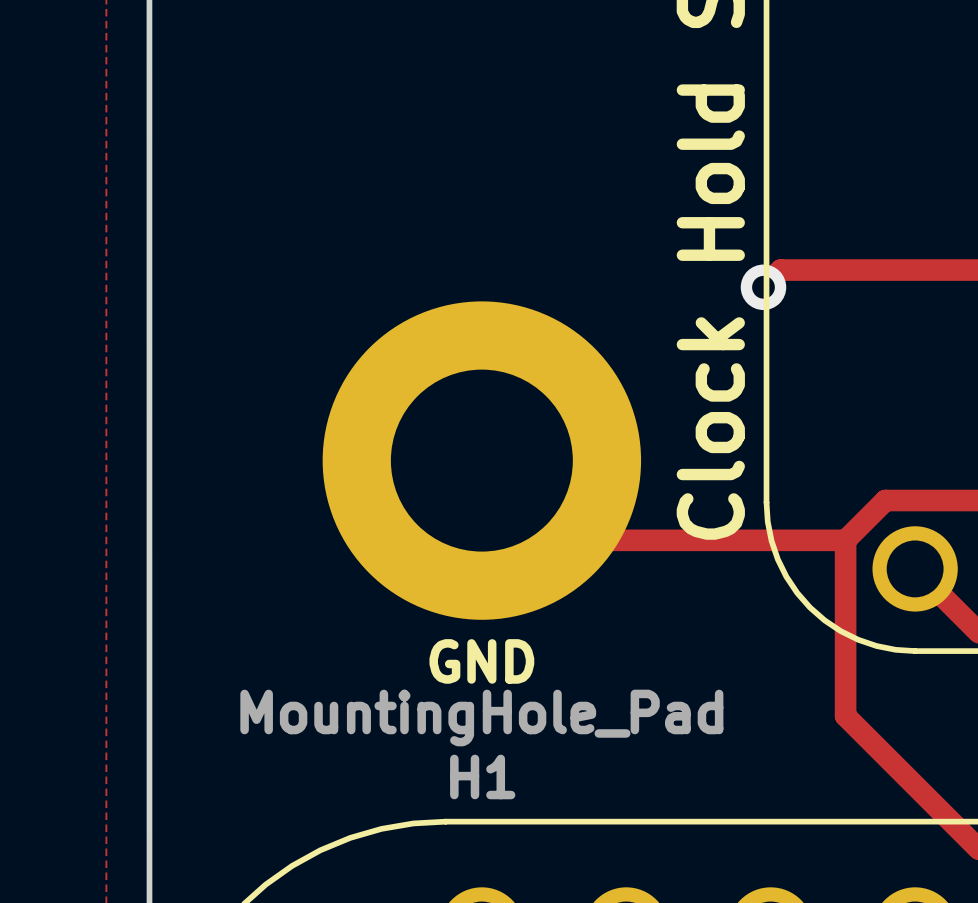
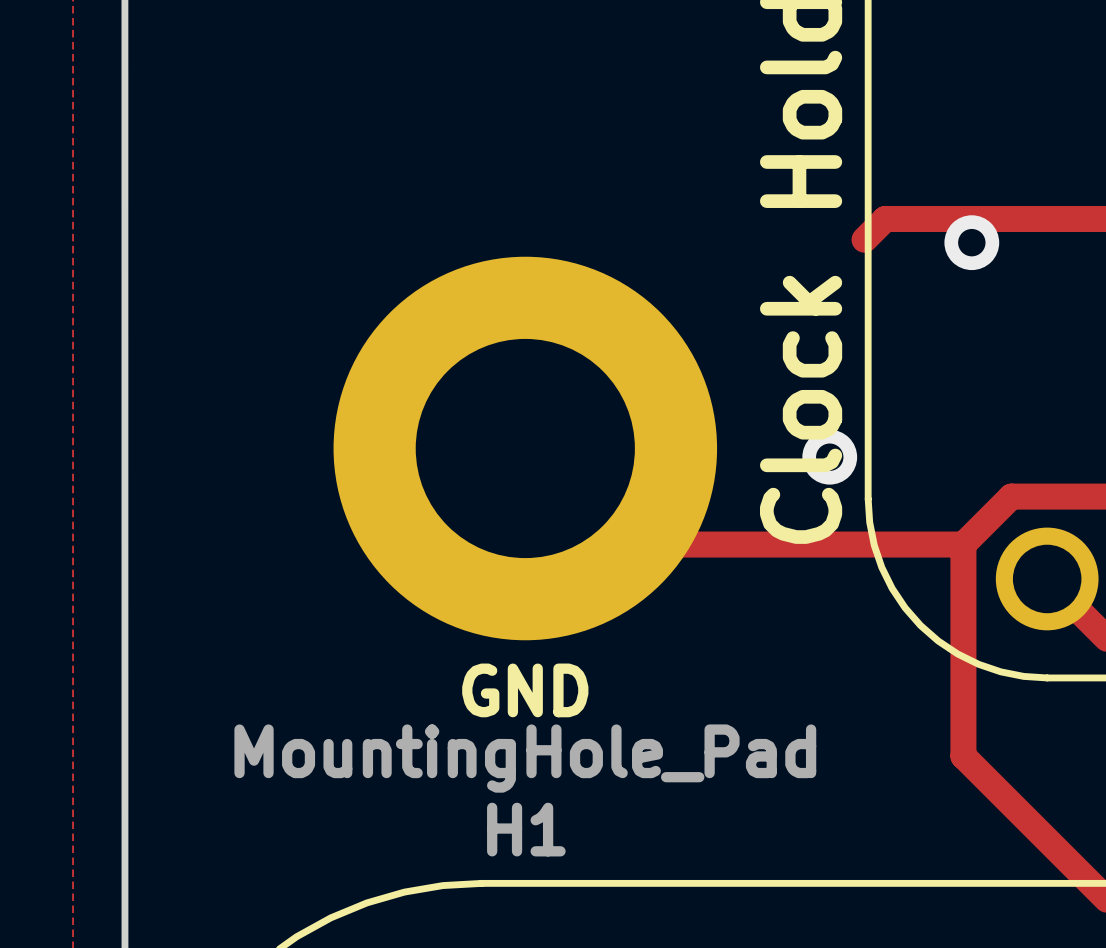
via position: (763, 287) -> (971, 242)
via: none -> (829, 457)

